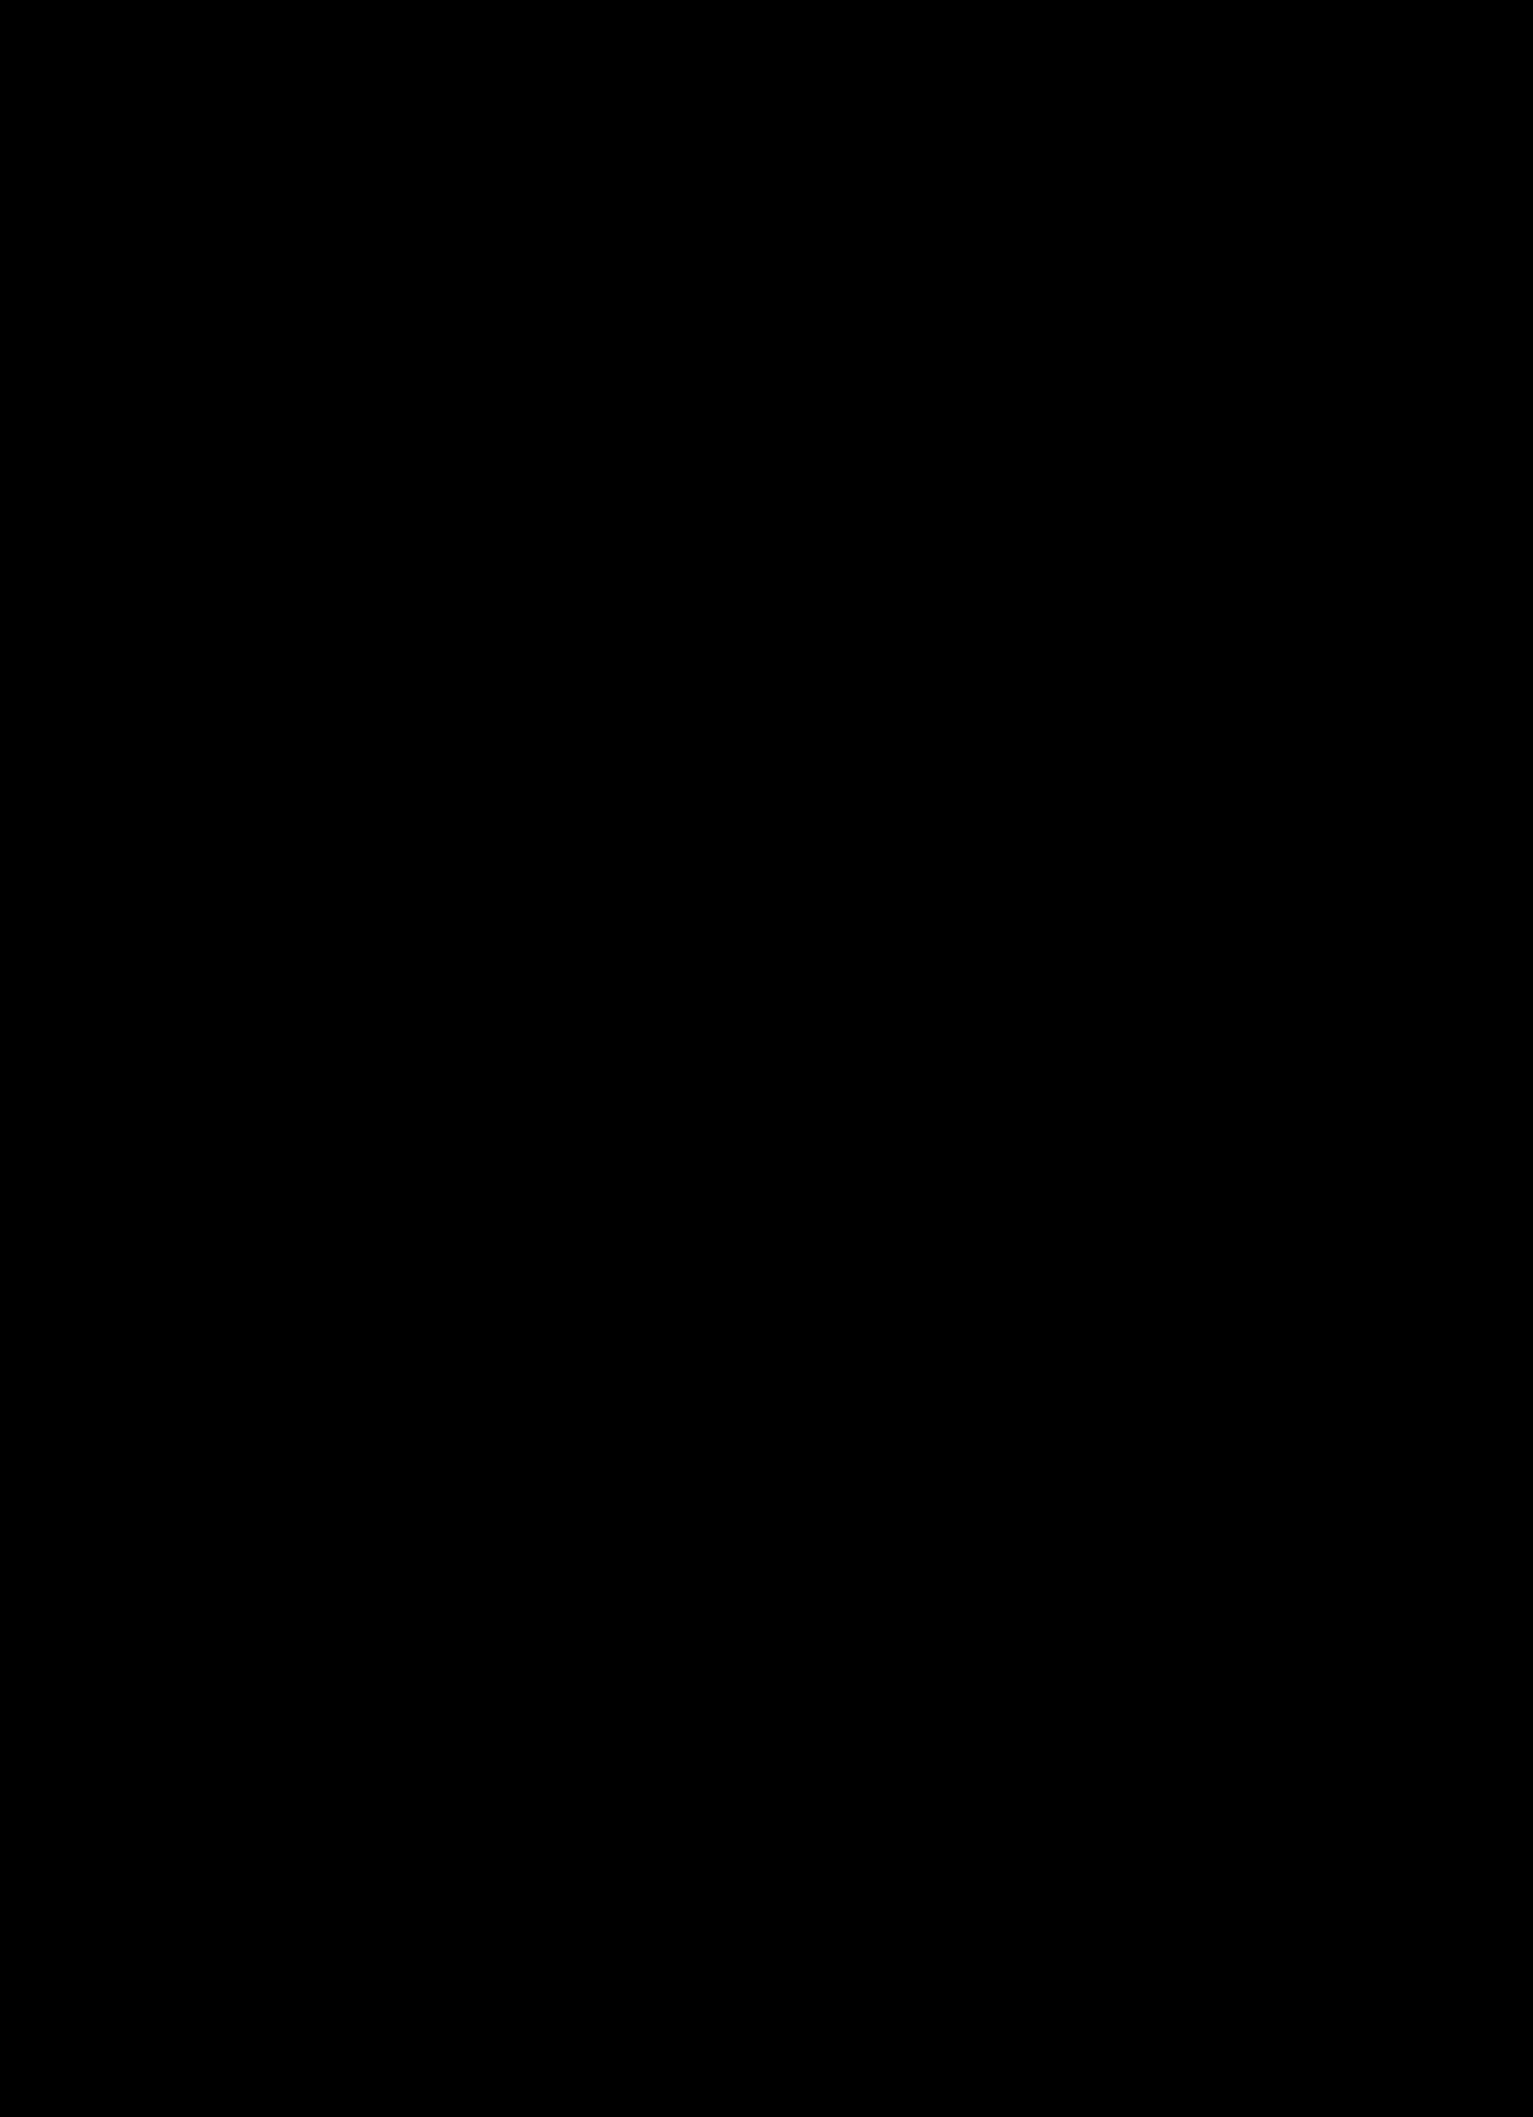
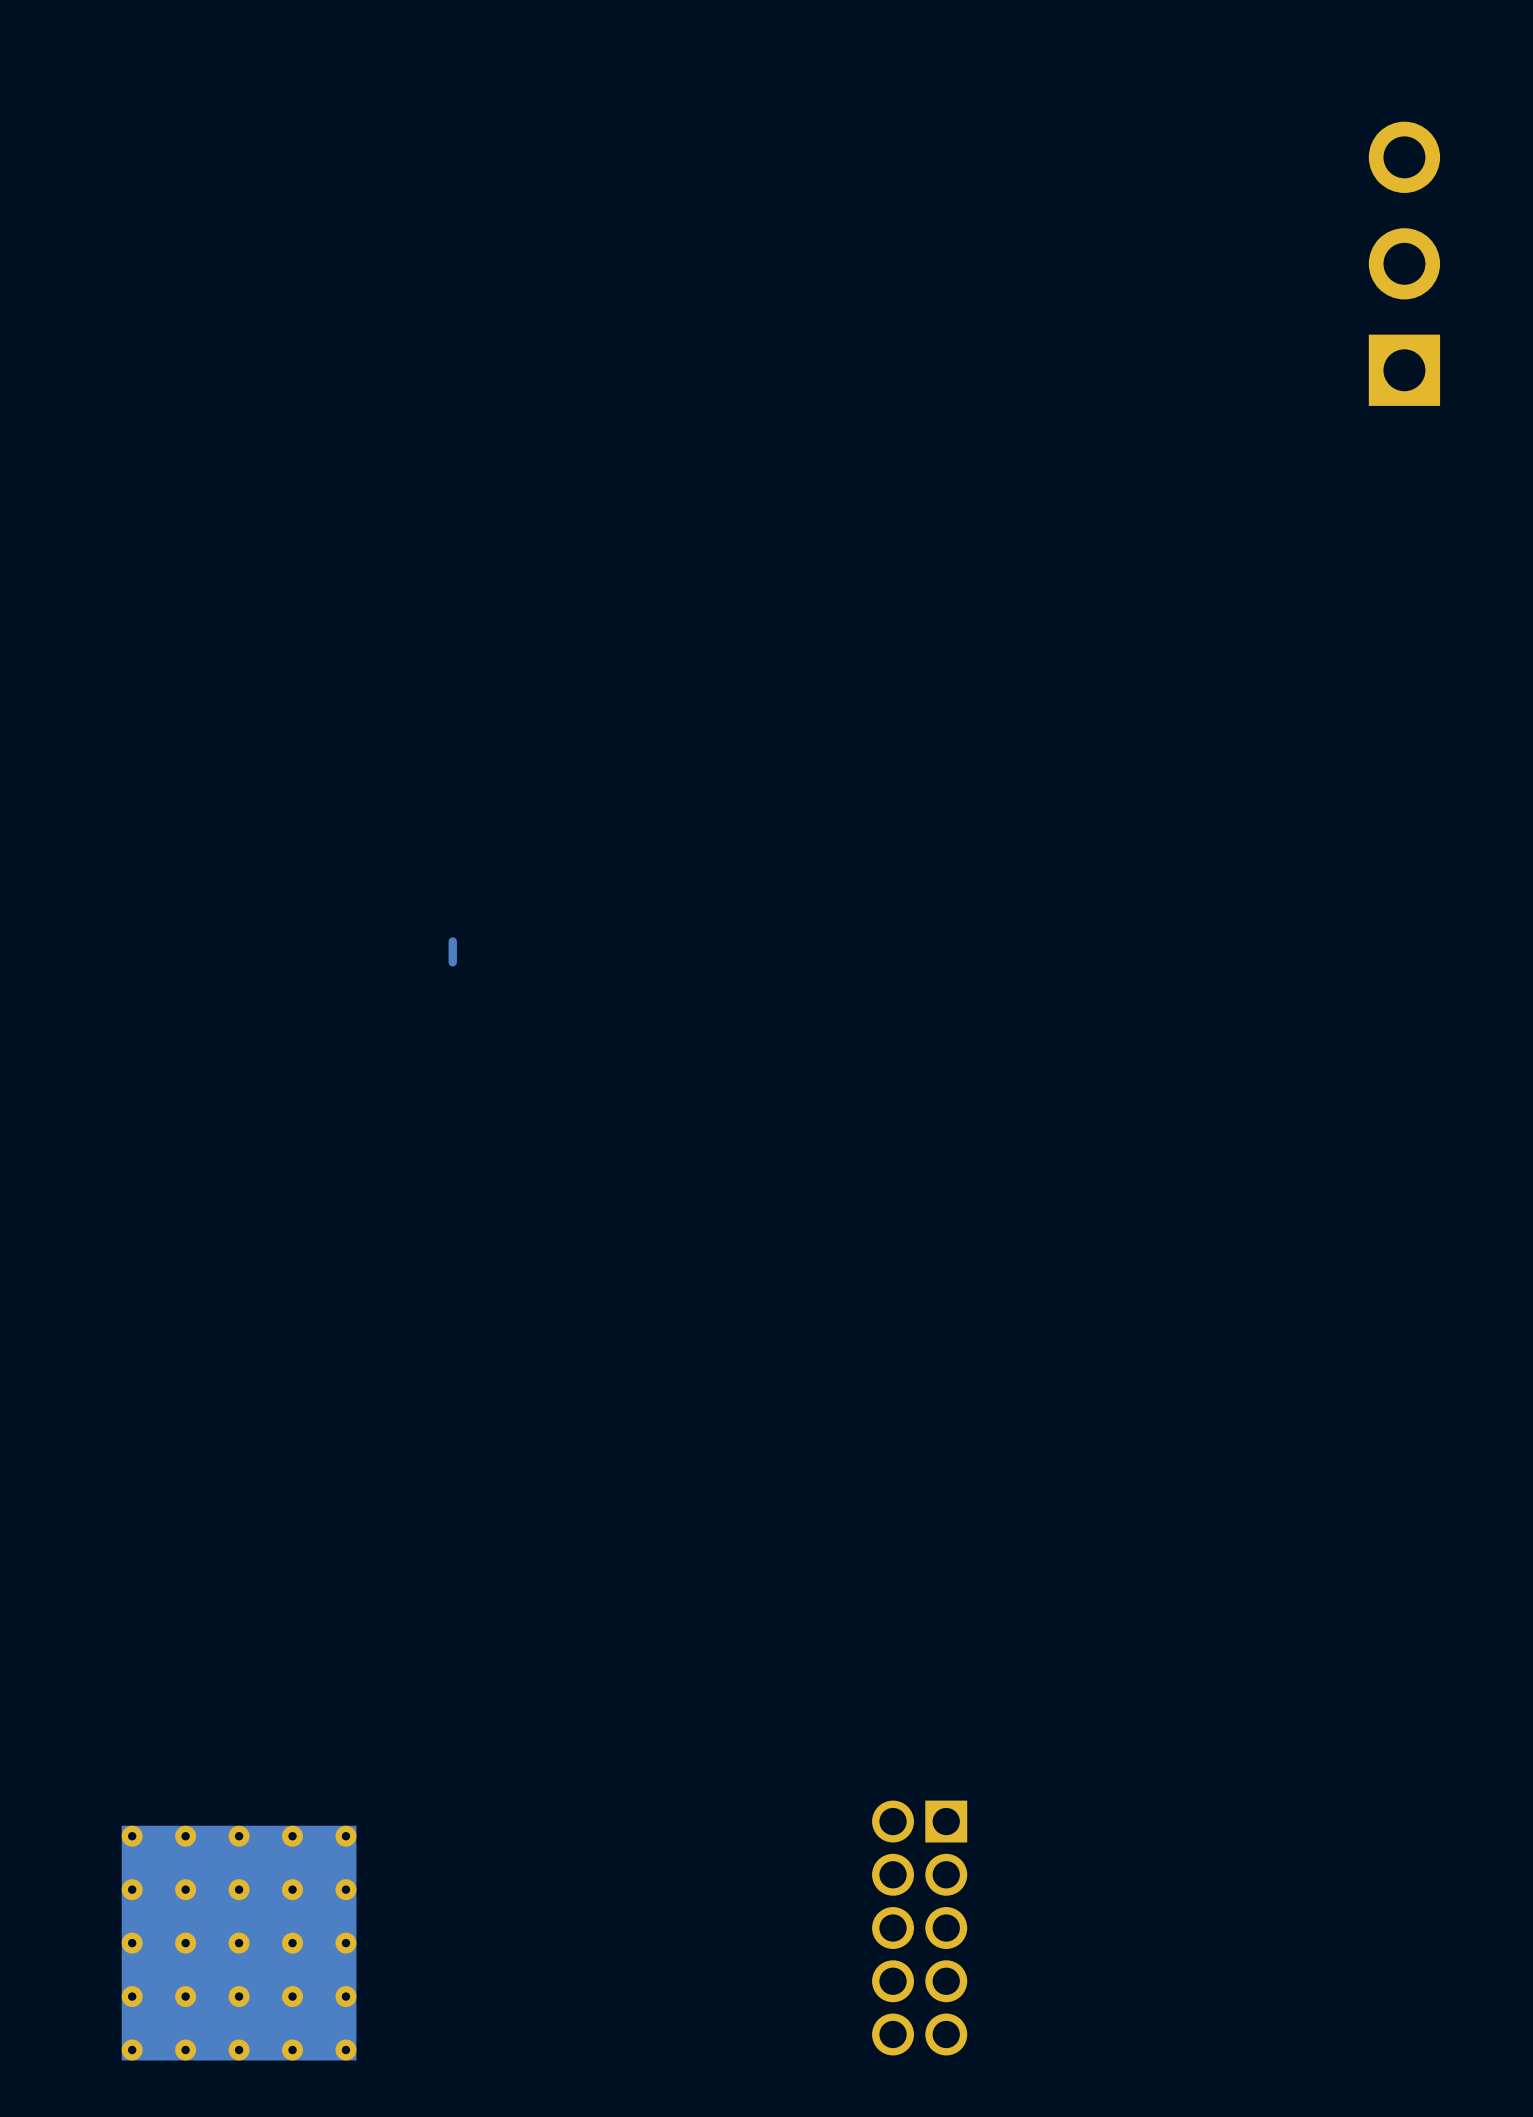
part: none -> (1404, 263)
track: none -> (452, 941) (452, 962)
part: none -> (919, 1928)
part: none -> (239, 1943)

